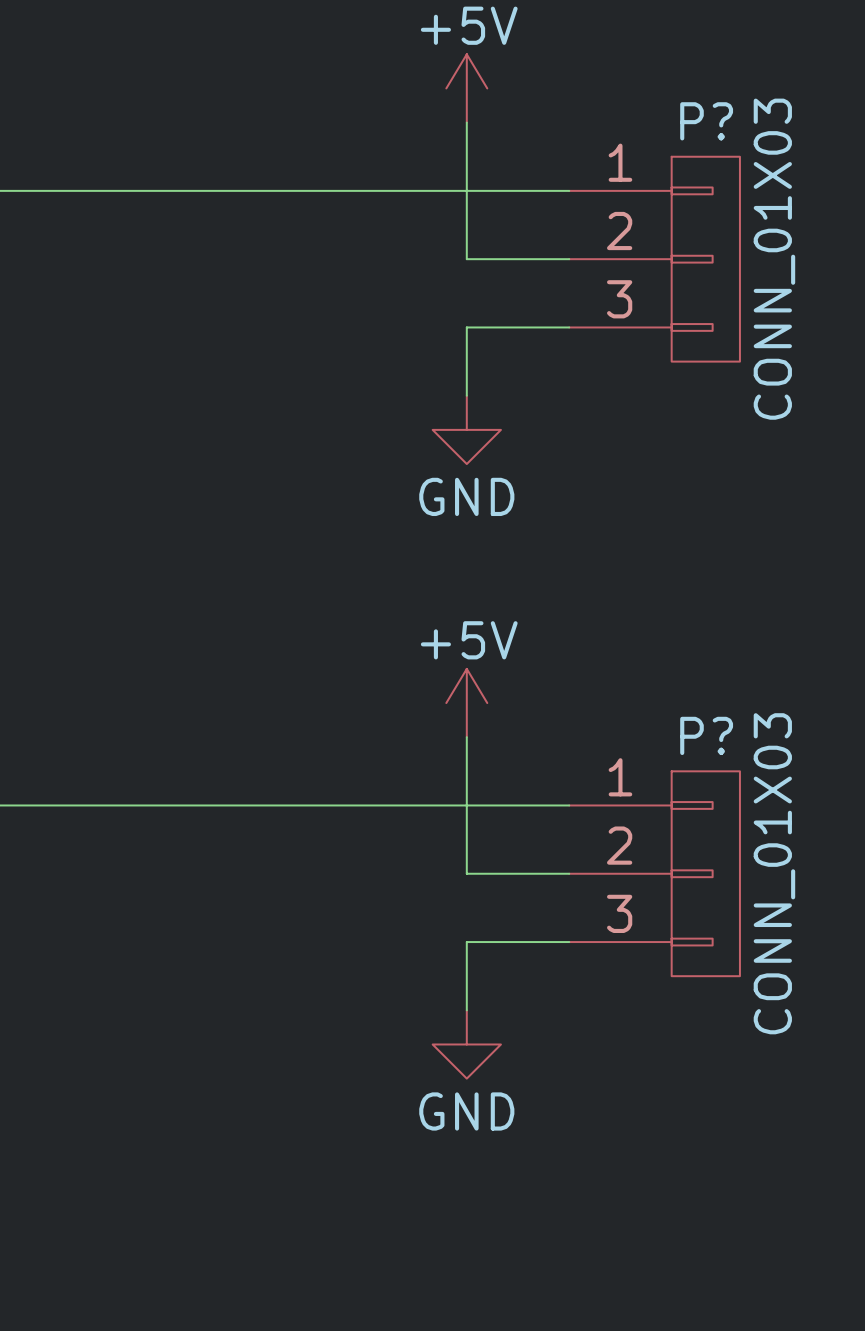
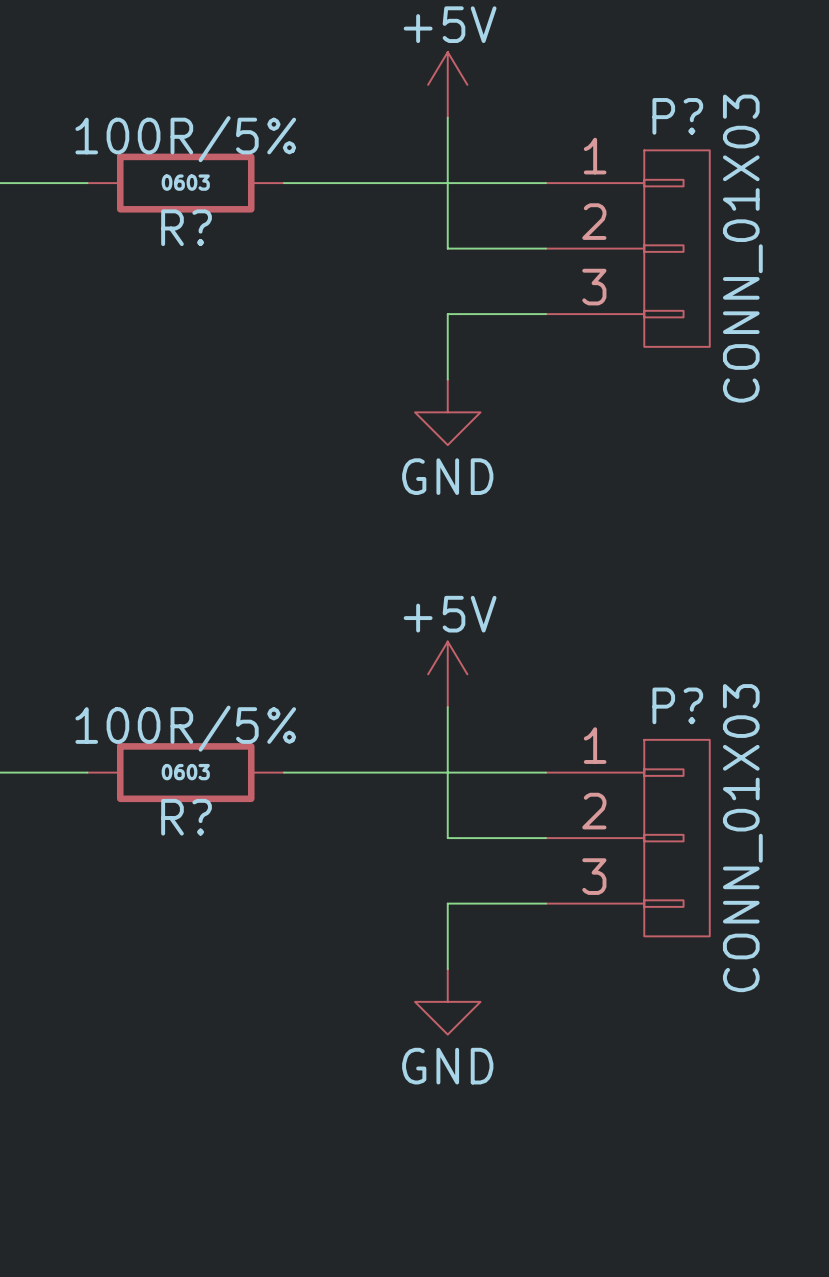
wire: (91, 190) (296, 190) -> none
R?: none -> 100R/5% (185, 183)
wire: (91, 805) (296, 805) -> none
R?: none -> 100R/5% (185, 772)

